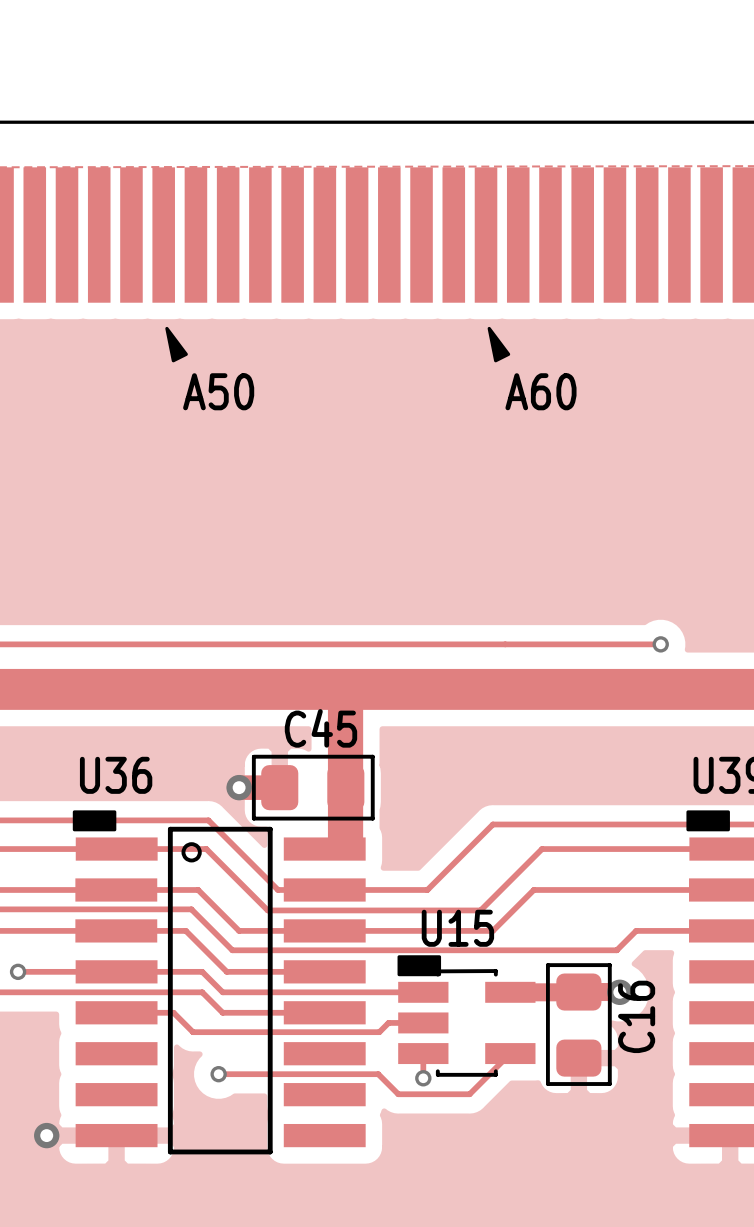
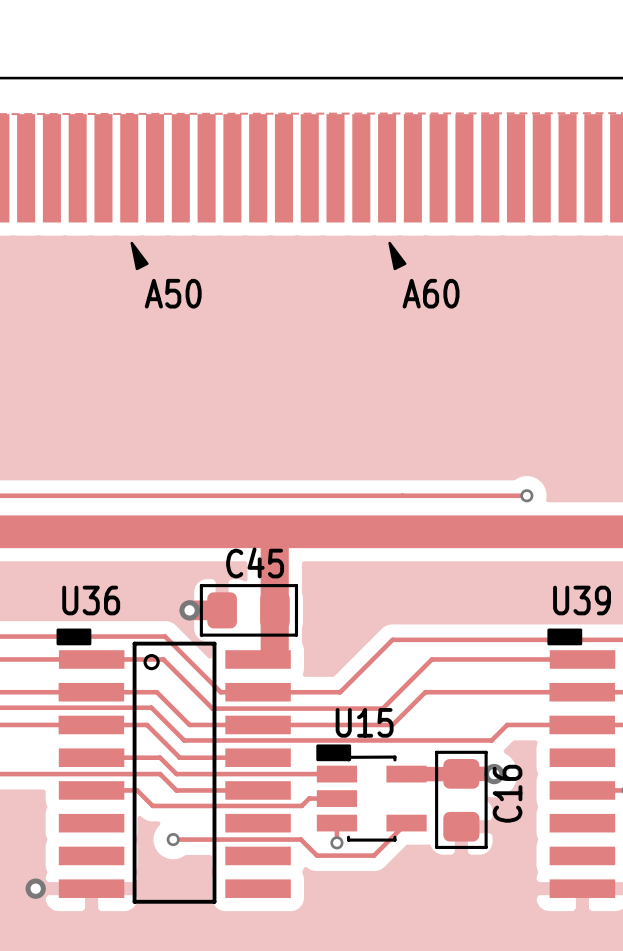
track: (18, 971) (116, 971) -> none
via: (18, 971) -> none

